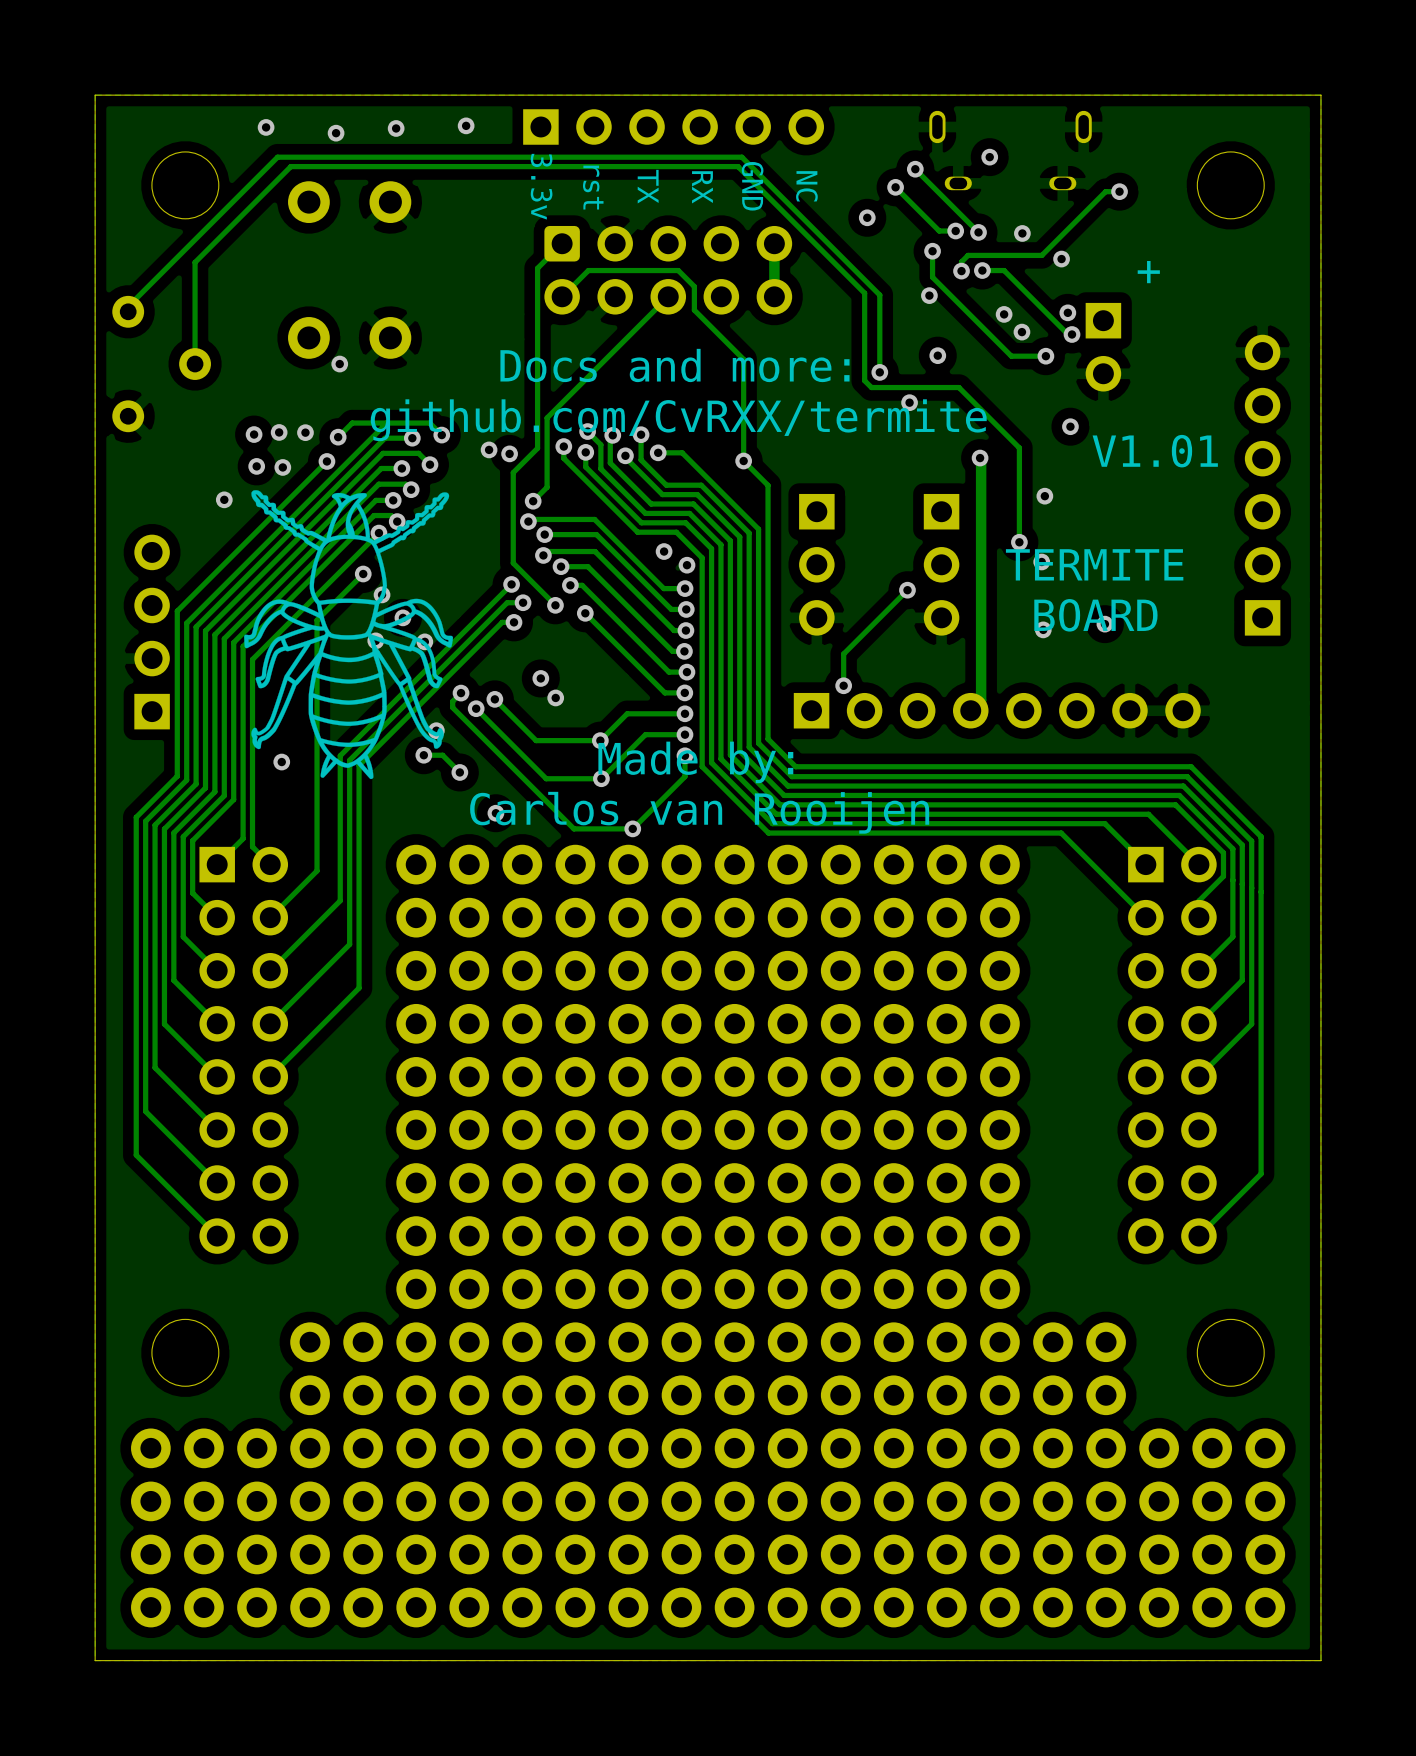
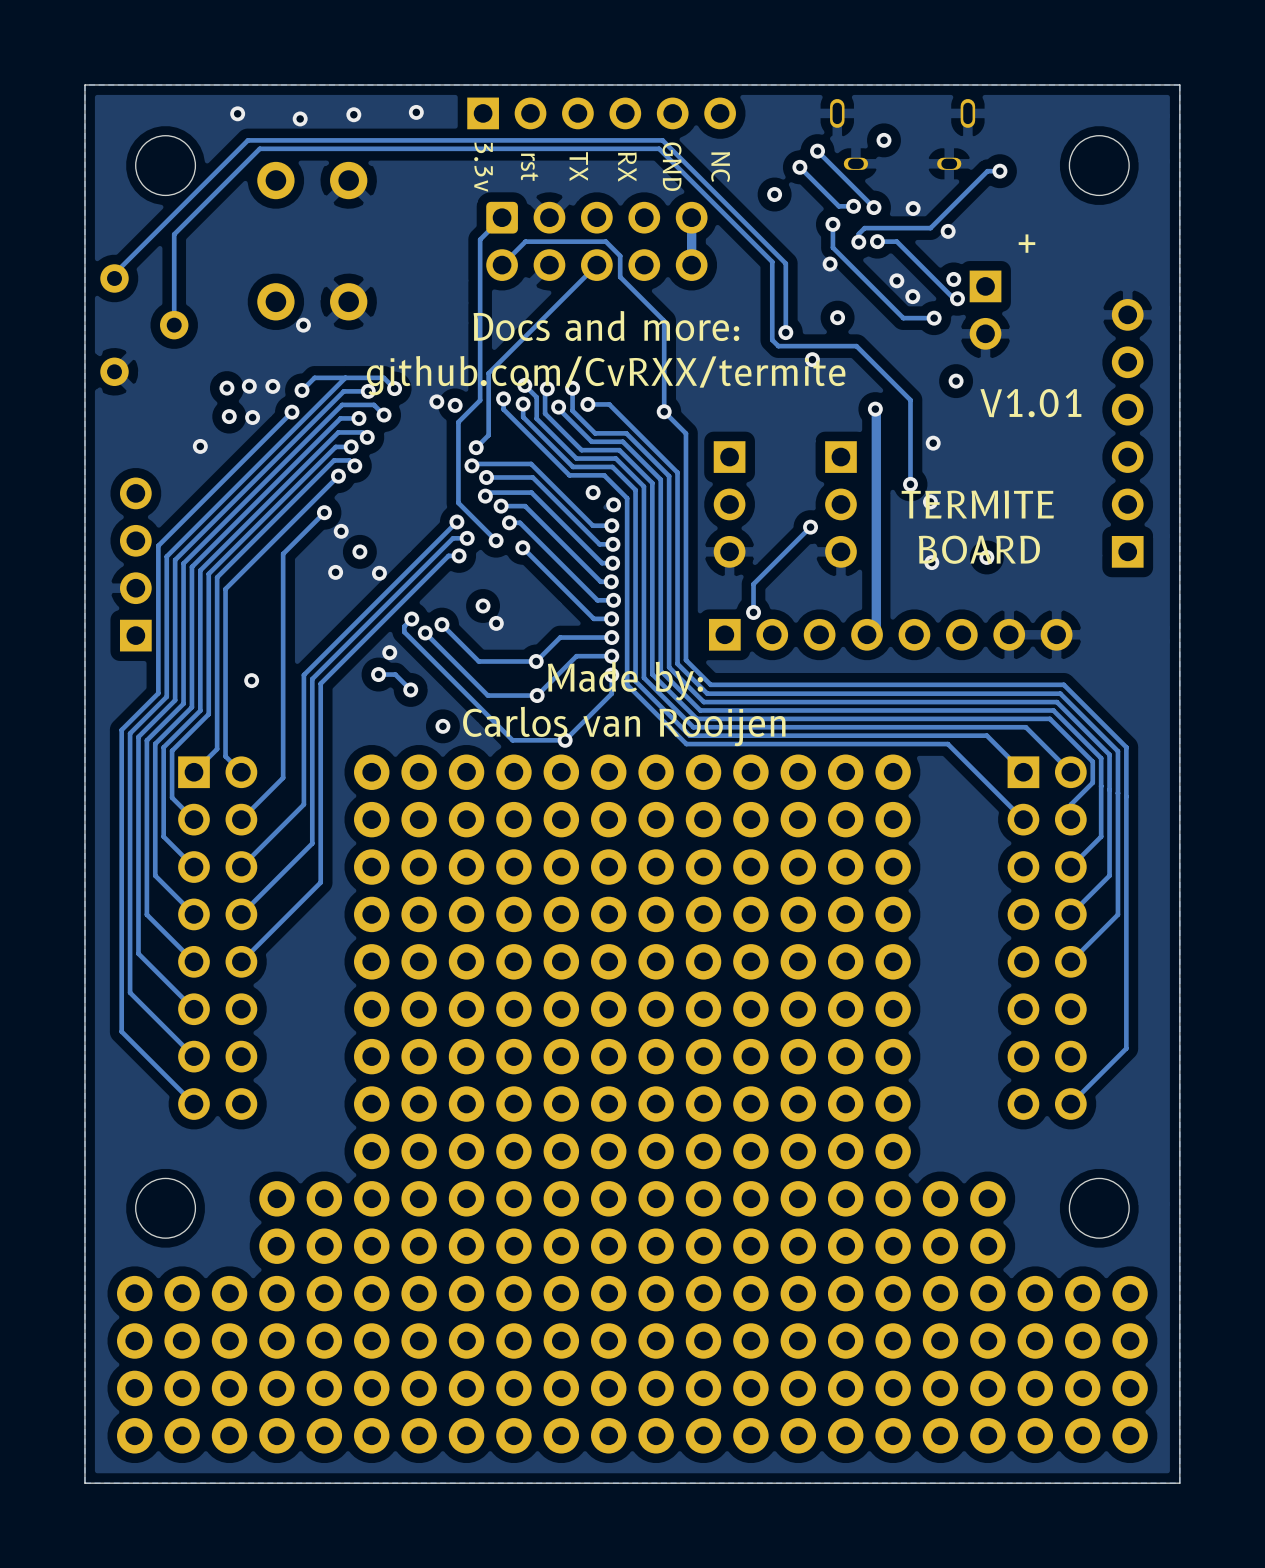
drawing: [244, 490, 454, 780] -> none

